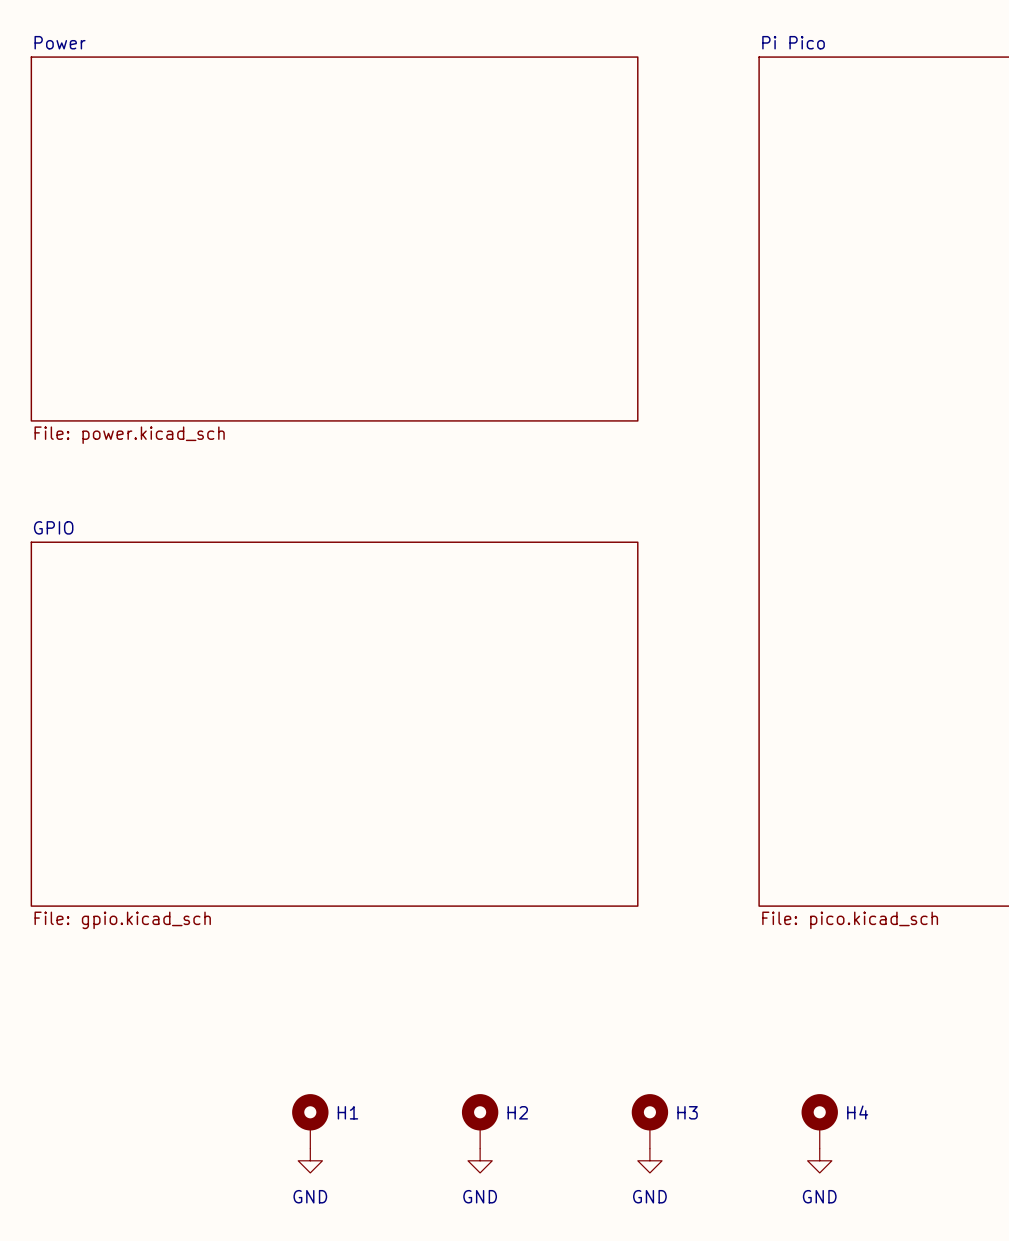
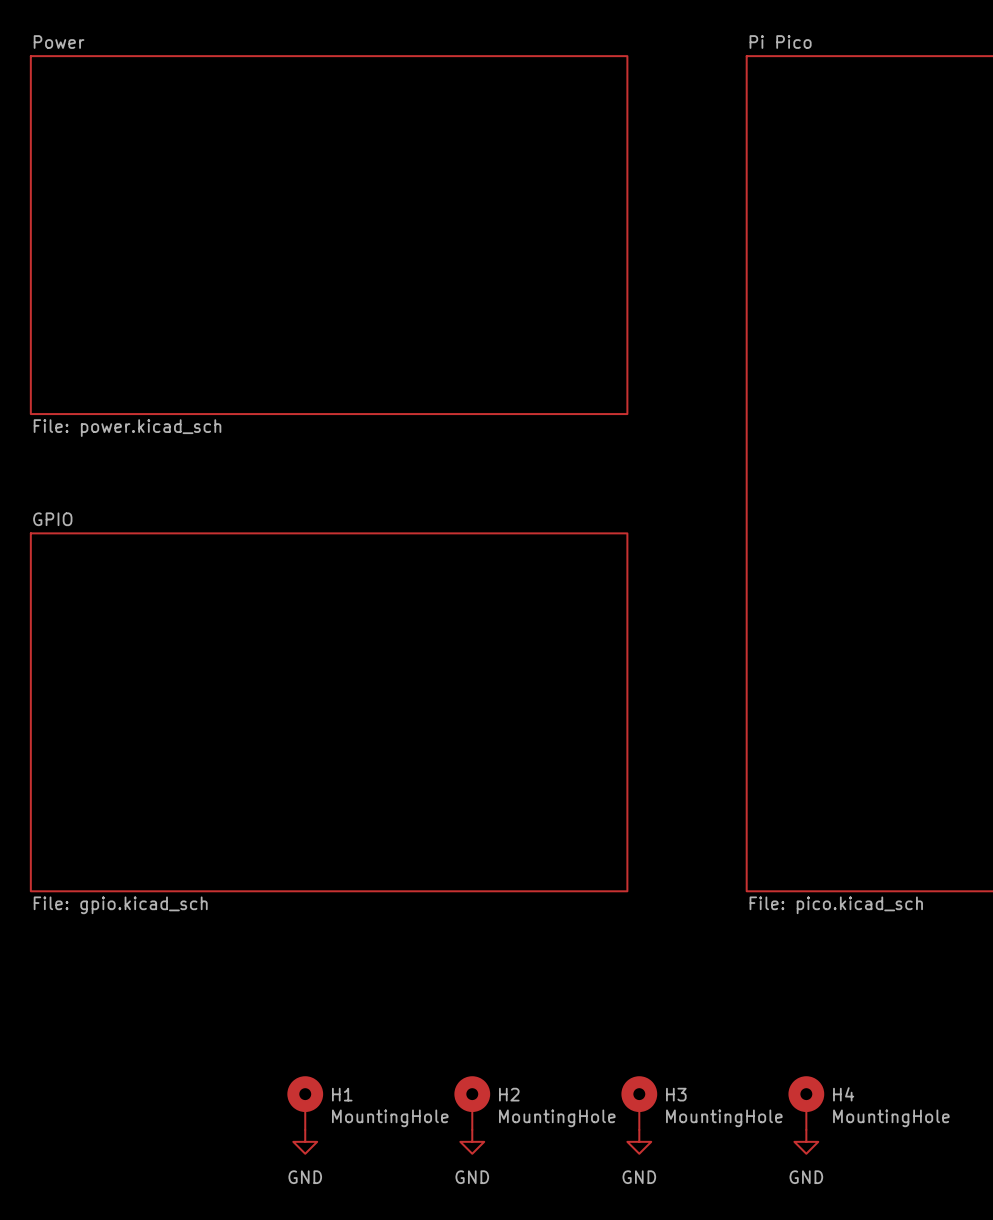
H1 value: none -> MountingHole (390, 1118)
H2 value: none -> MountingHole (557, 1118)
H3 value: none -> MountingHole (724, 1118)
H4 value: none -> MountingHole (891, 1118)

